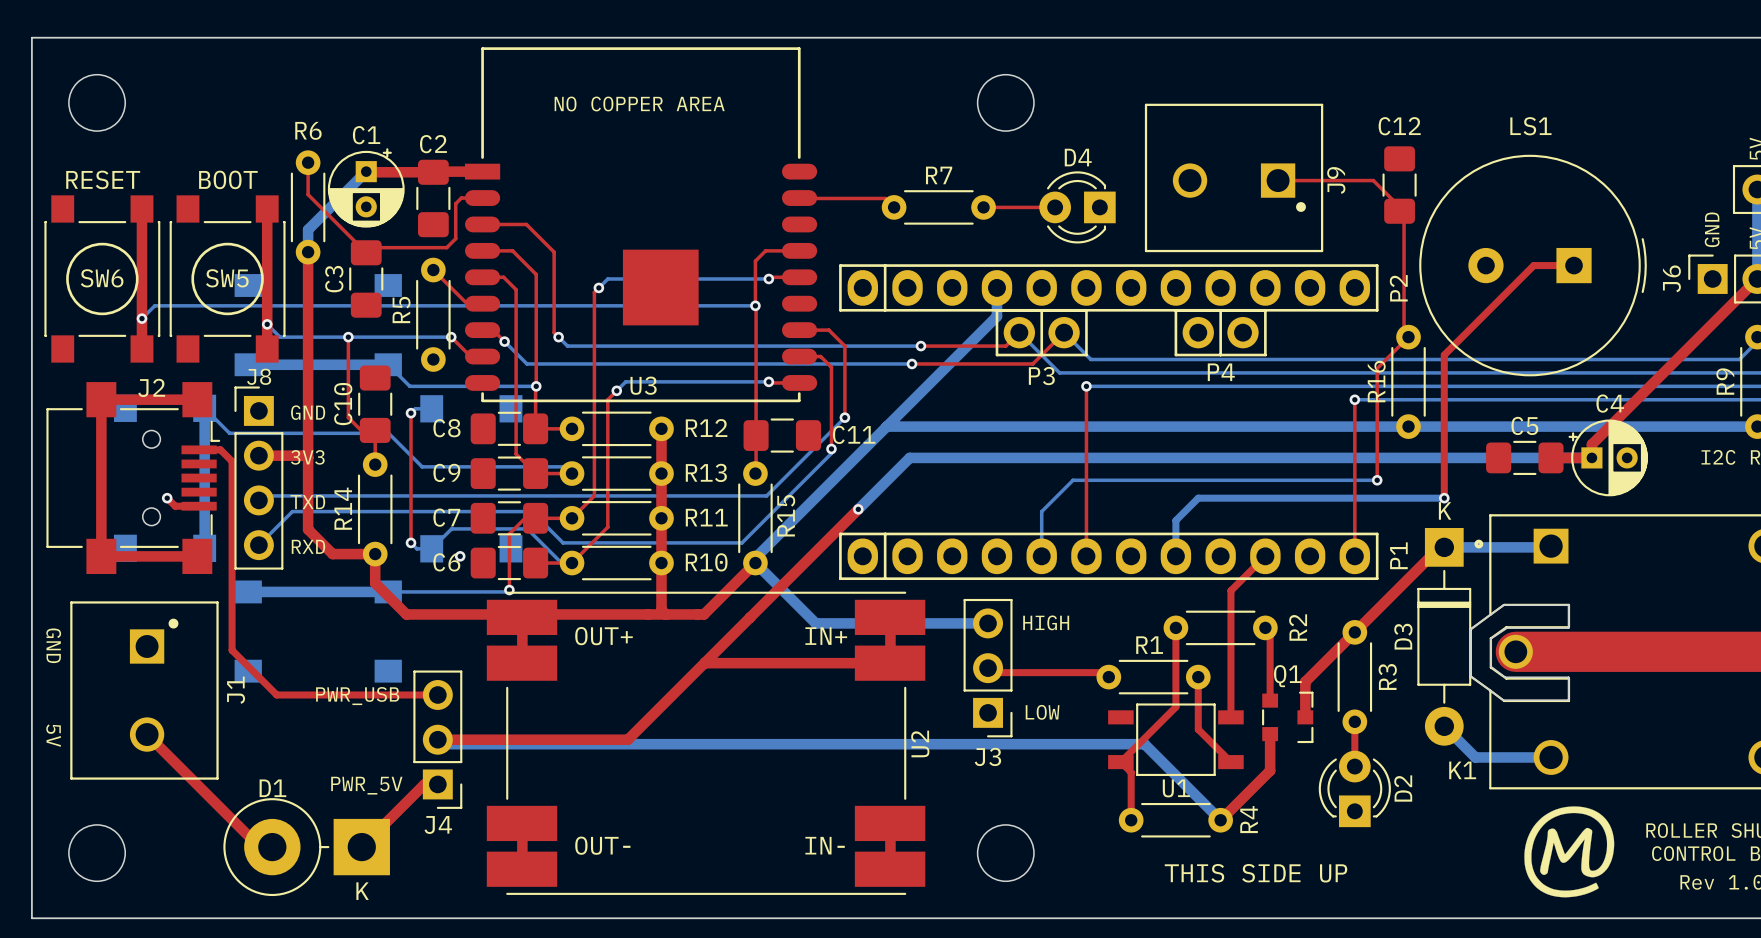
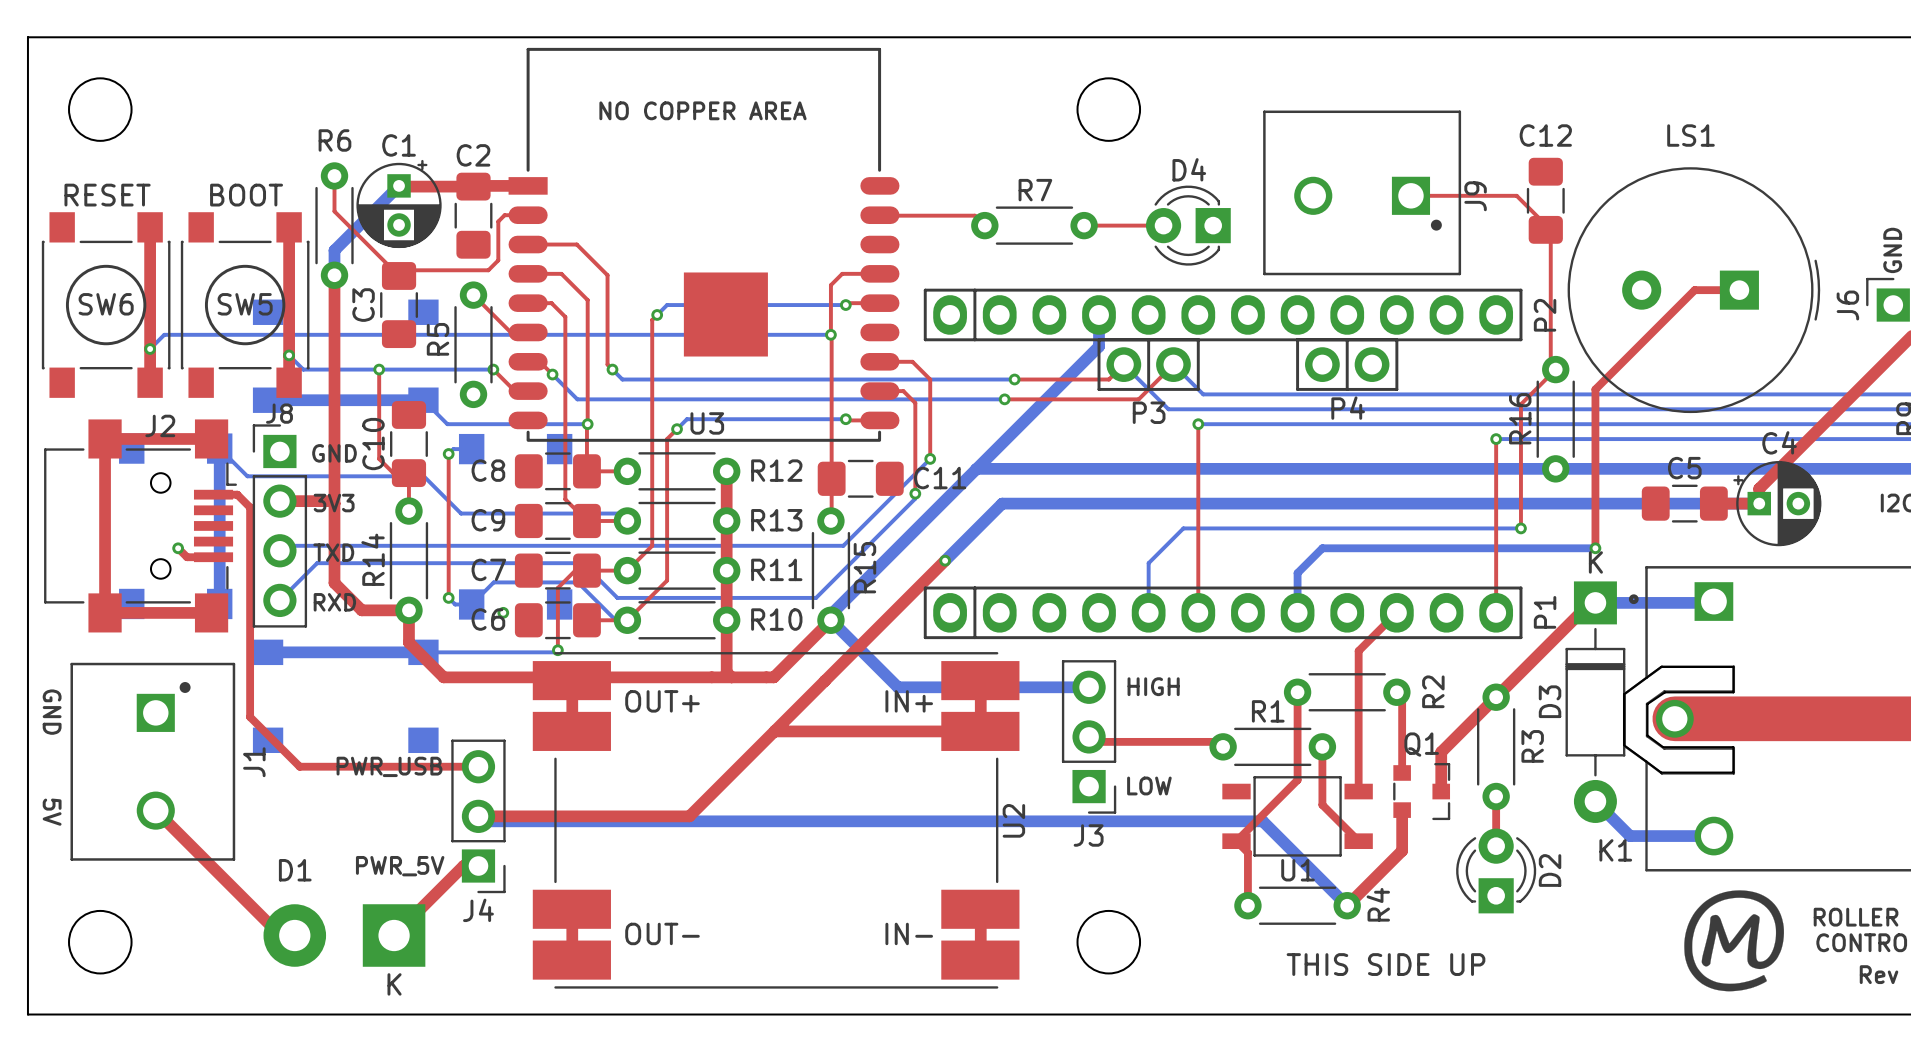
D1 footprint: [223, 798, 390, 897] -> [263, 904, 426, 967]

